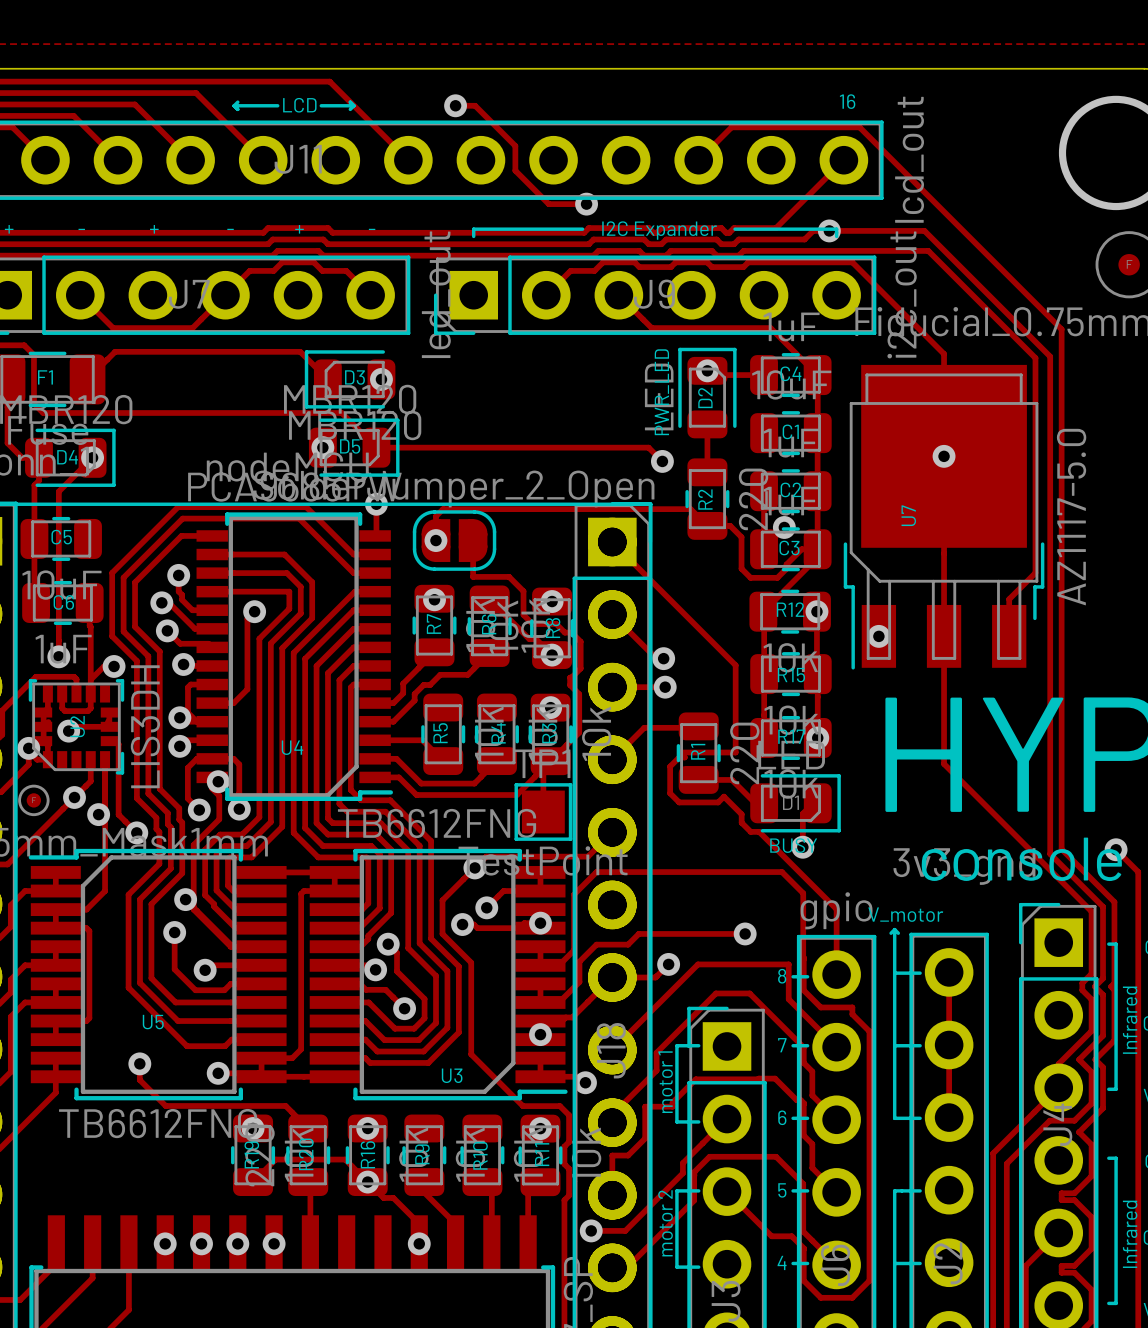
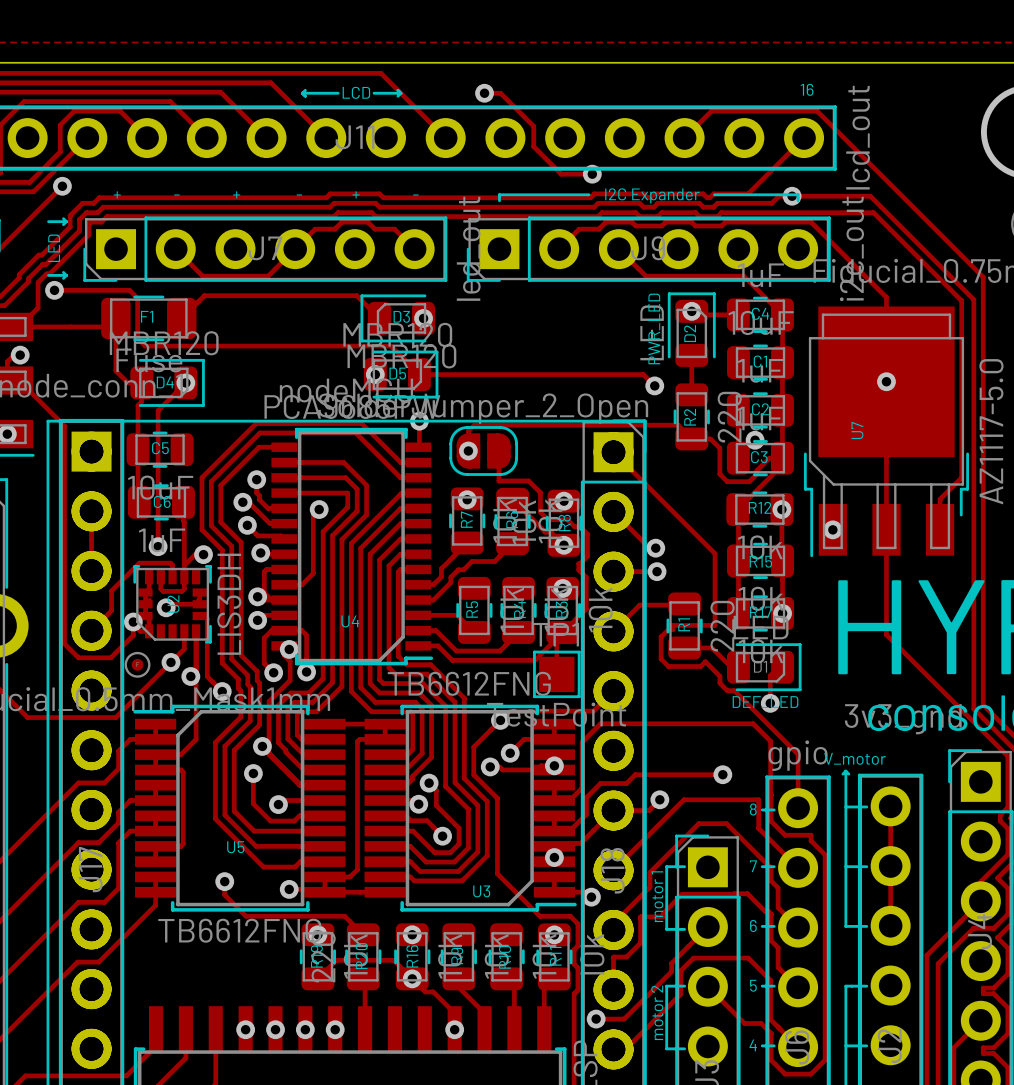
text: BUSY (793, 845) -> DEF_LED (765, 702)

